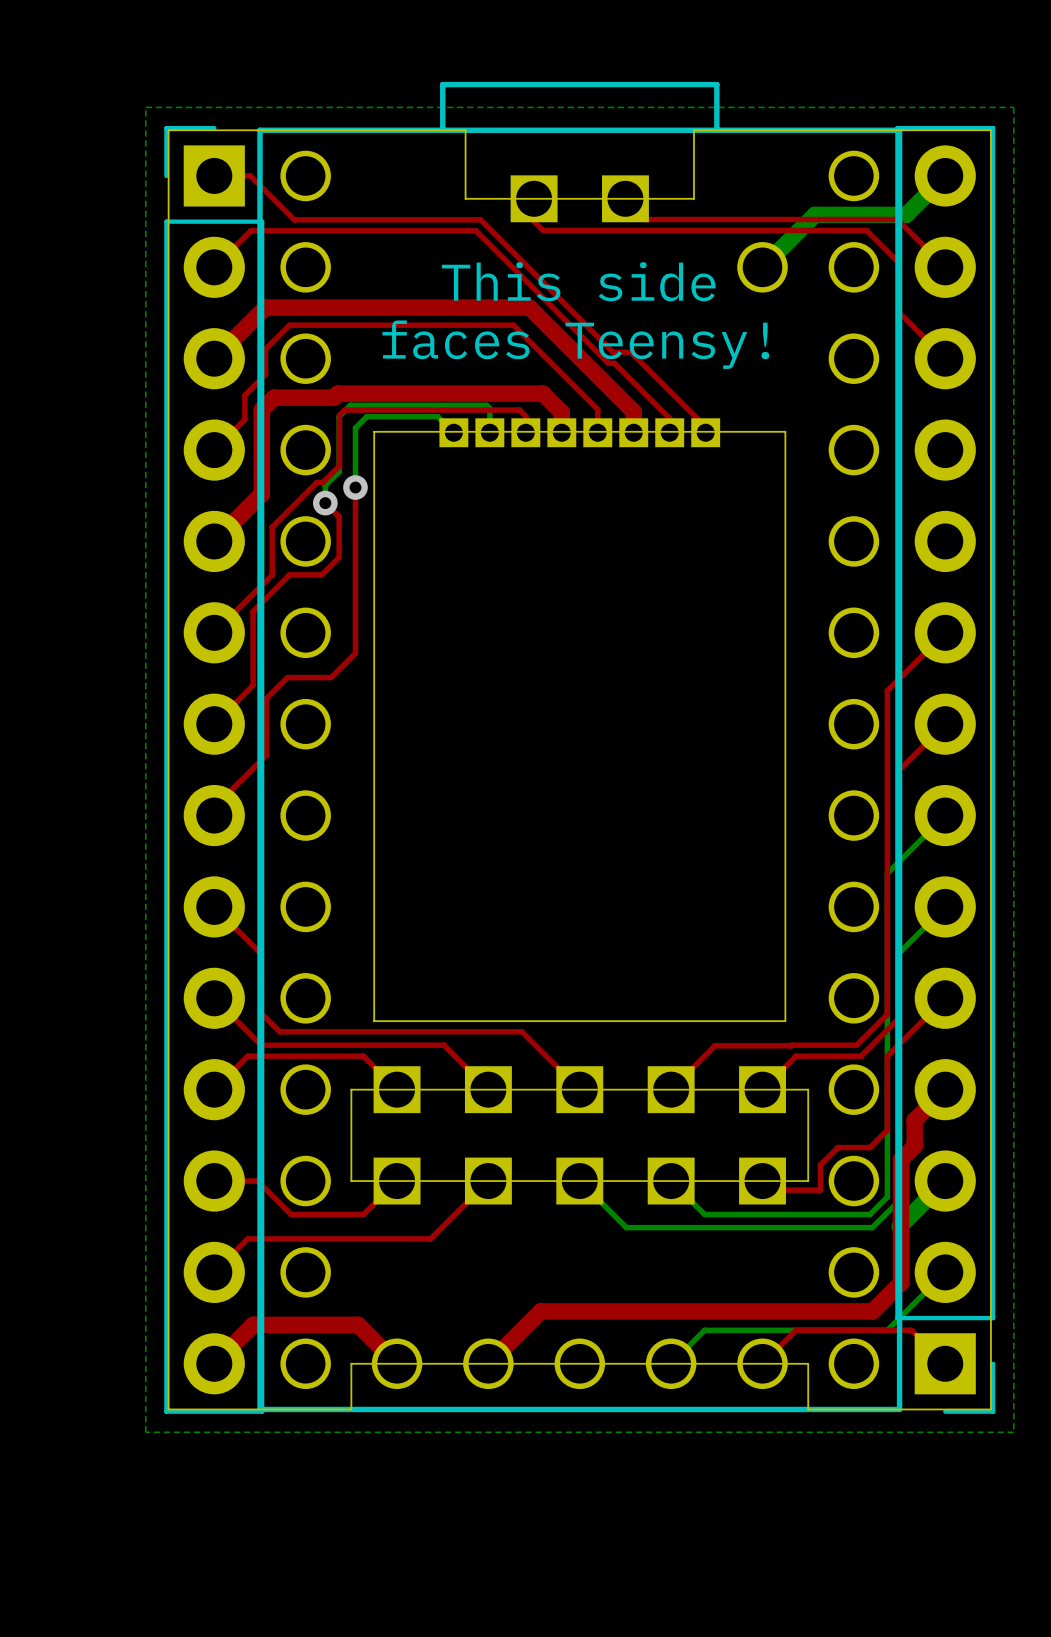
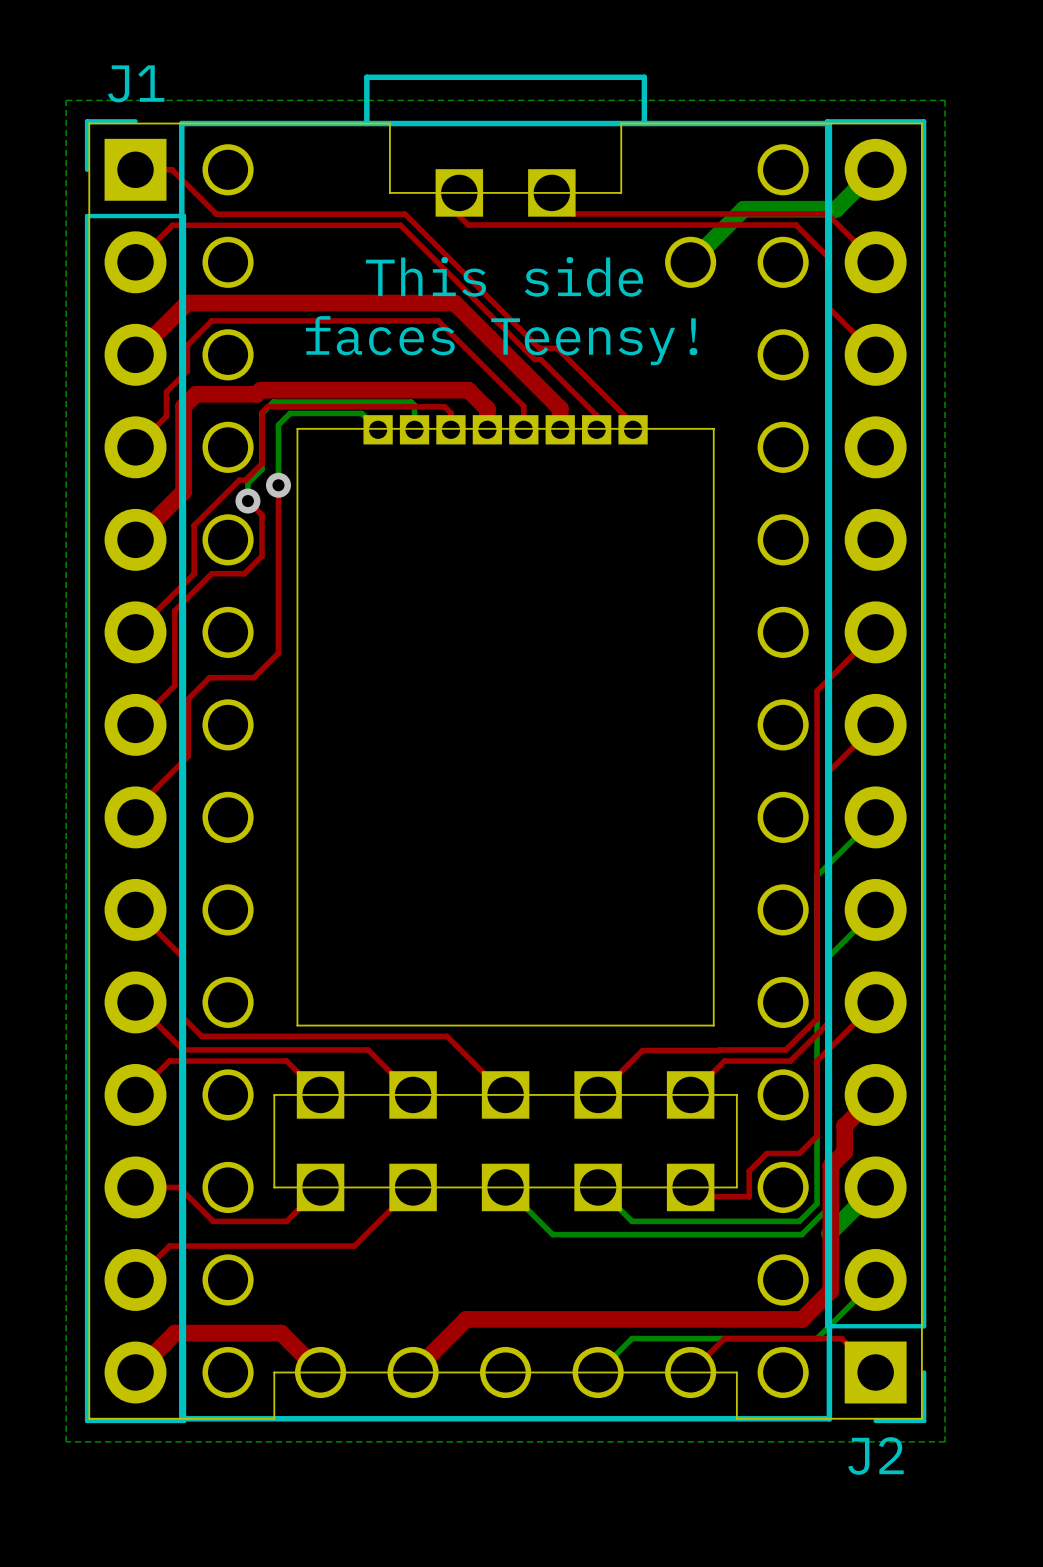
J1 name: none -> J1 (136, 83)
J2 name: none -> J2 (875, 1455)

